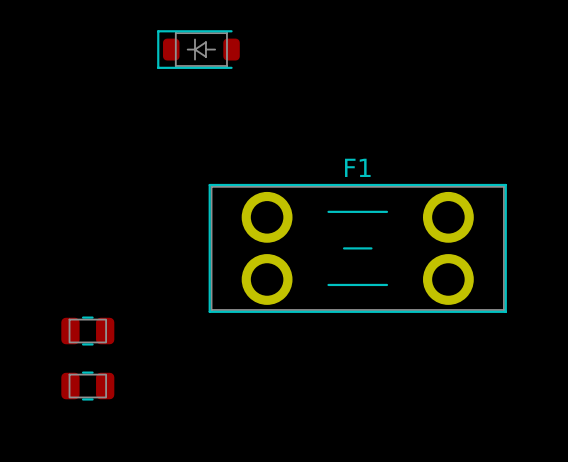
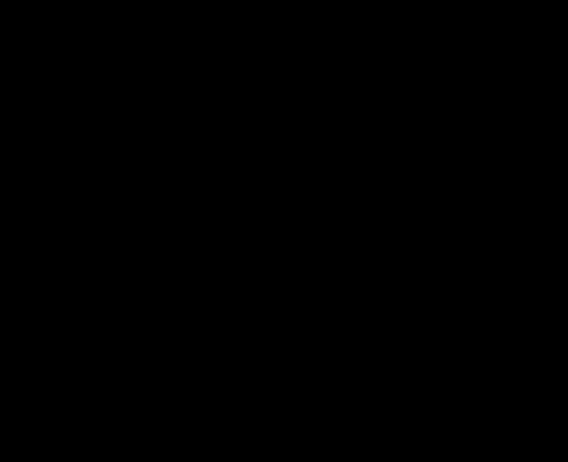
part: (198, 49) -> none
F1: (357, 248) -> none
part: (87, 331) -> none
part: (87, 386) -> none

